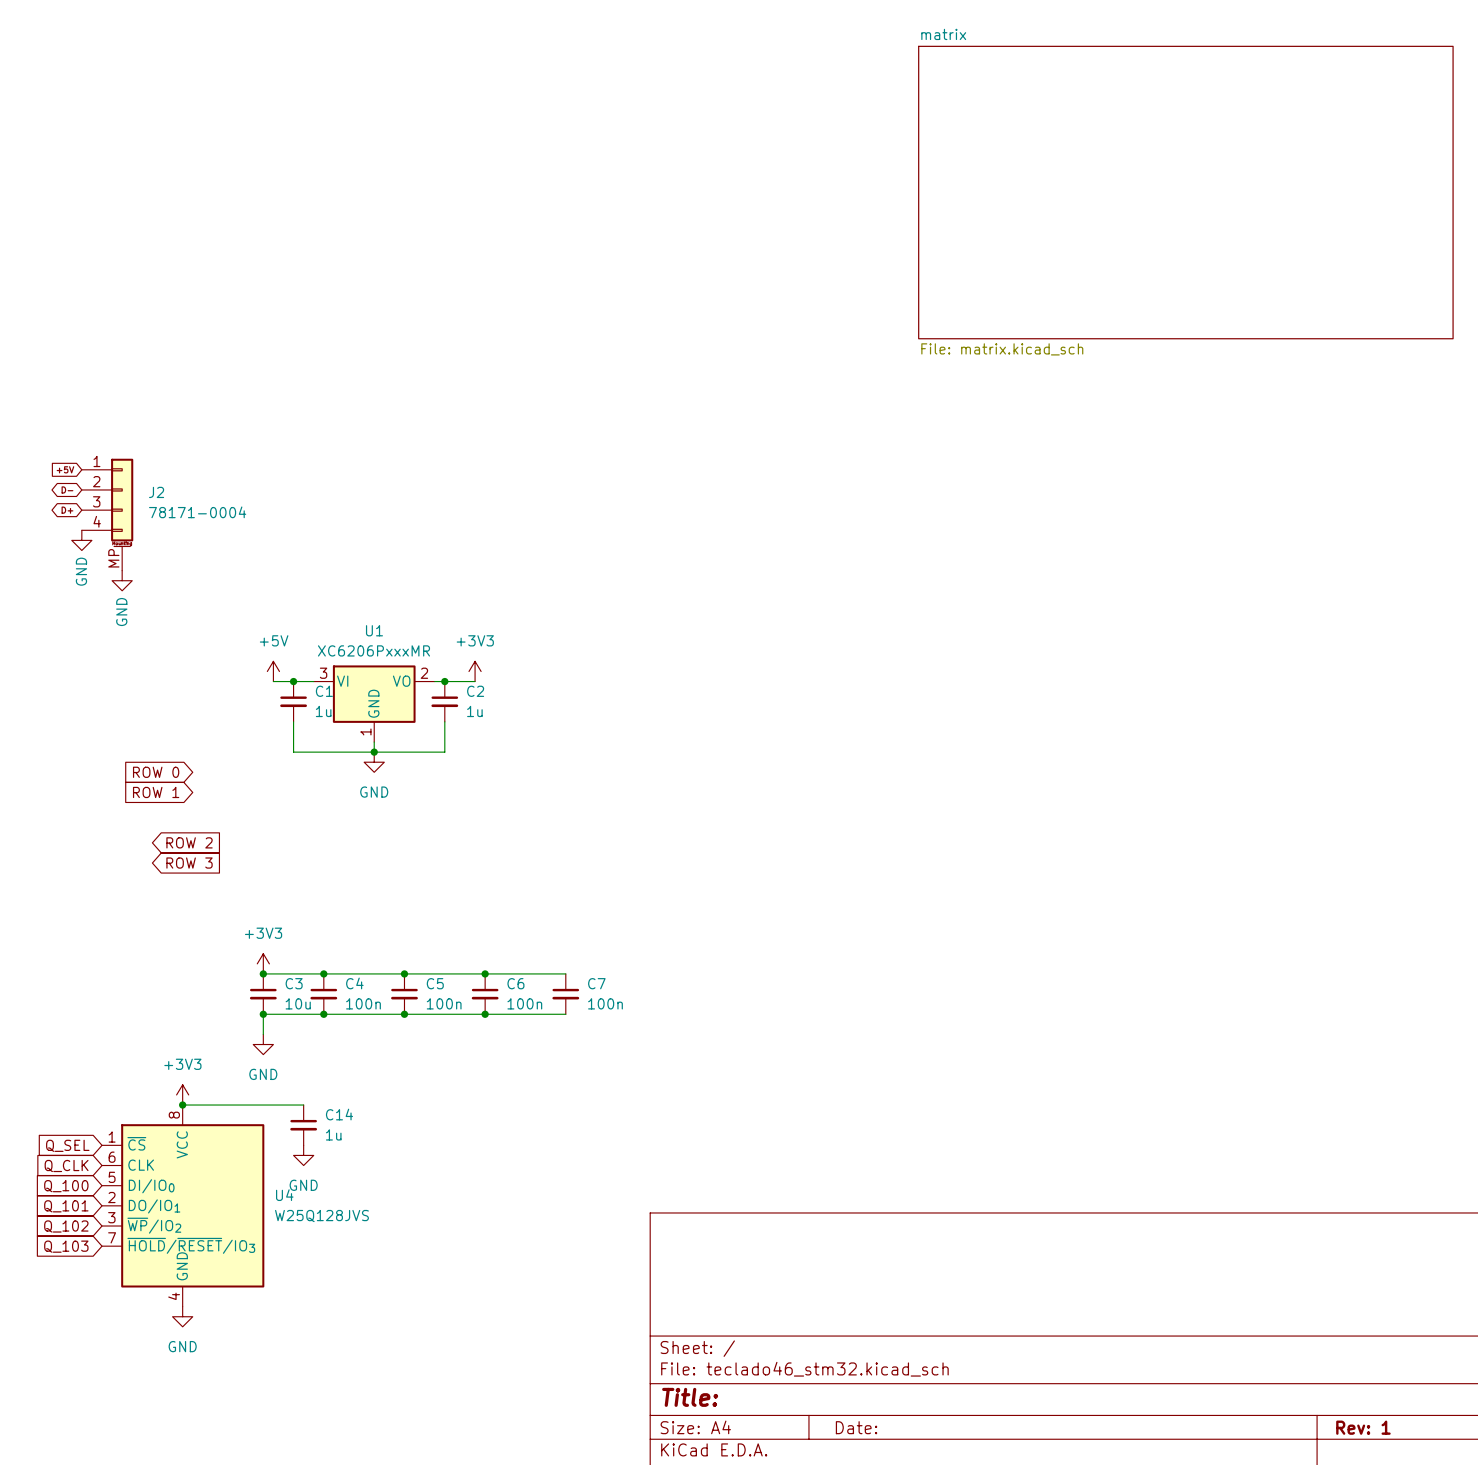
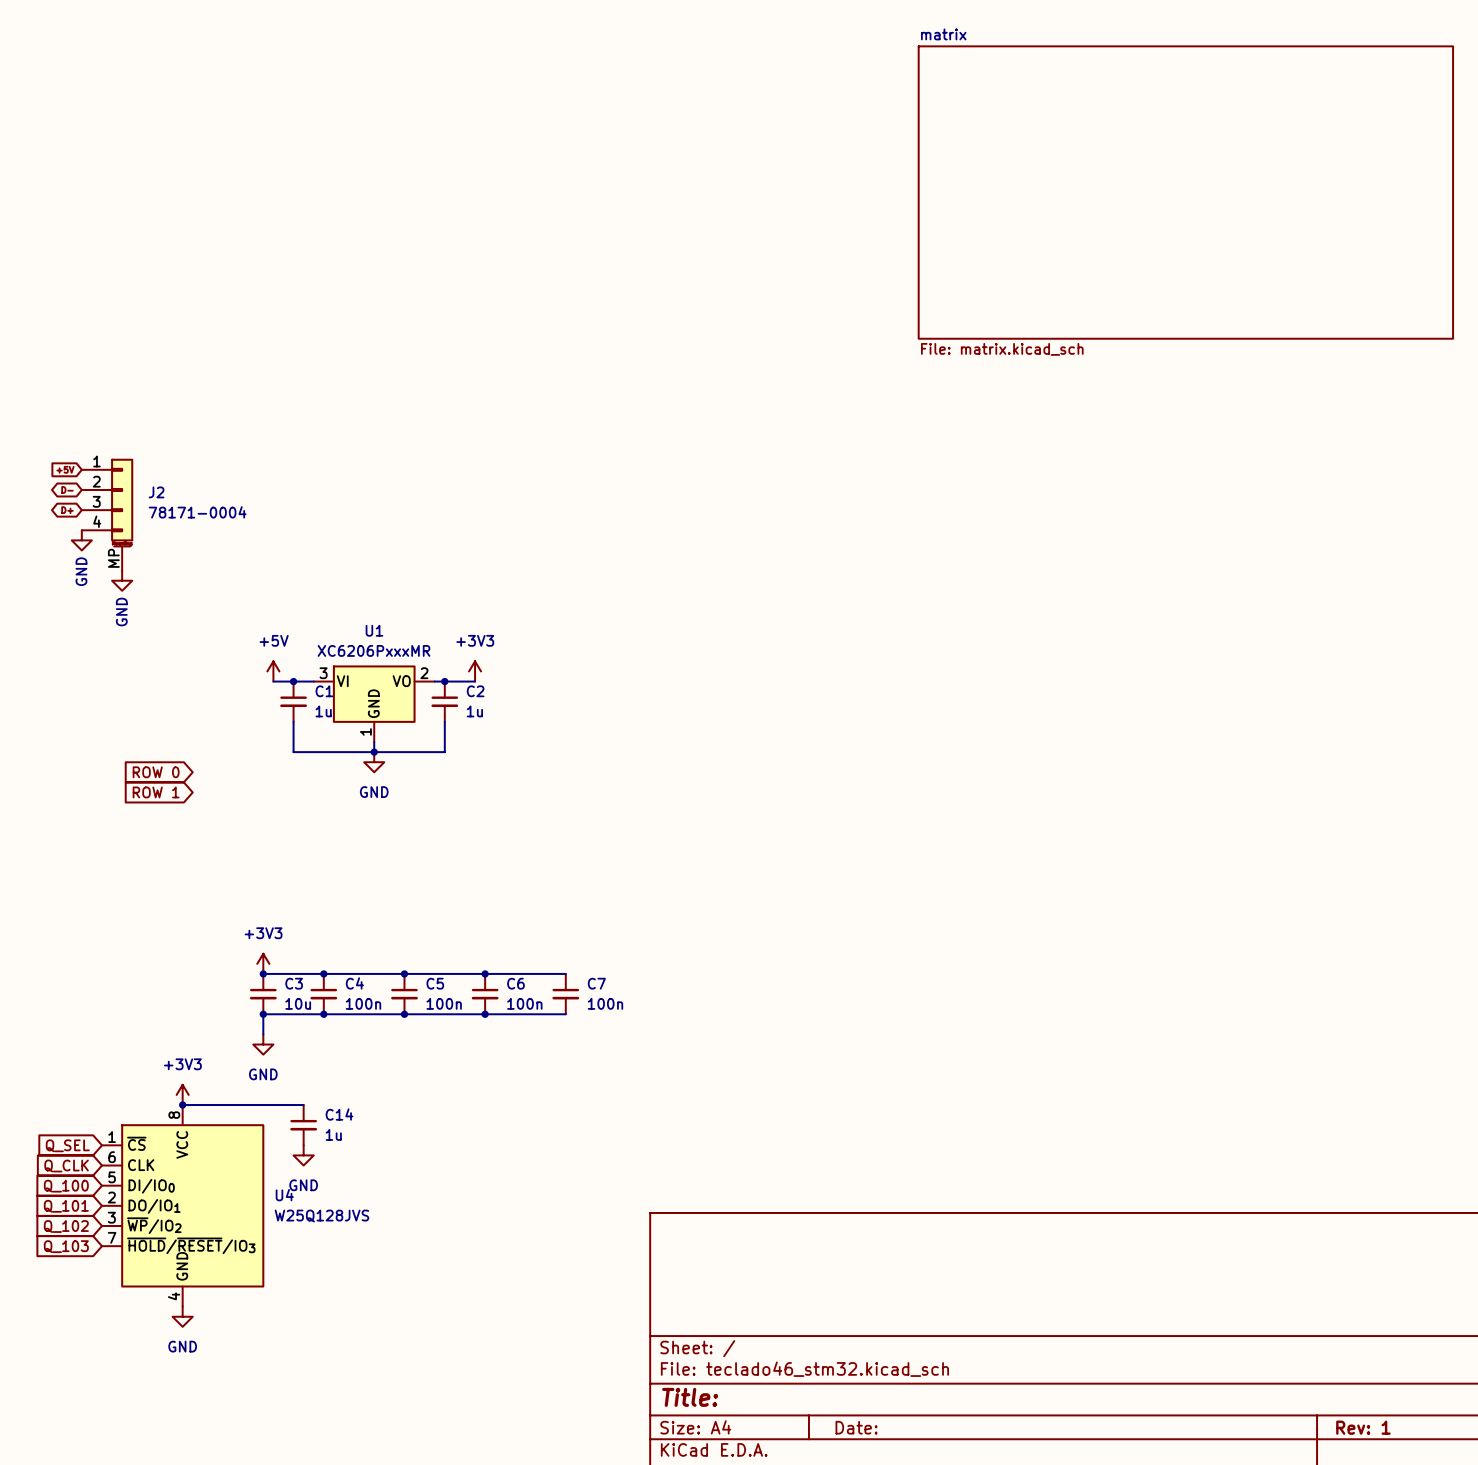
global label: ROW 2 (189, 842) -> none
global label: ROW 3 (189, 863) -> none

